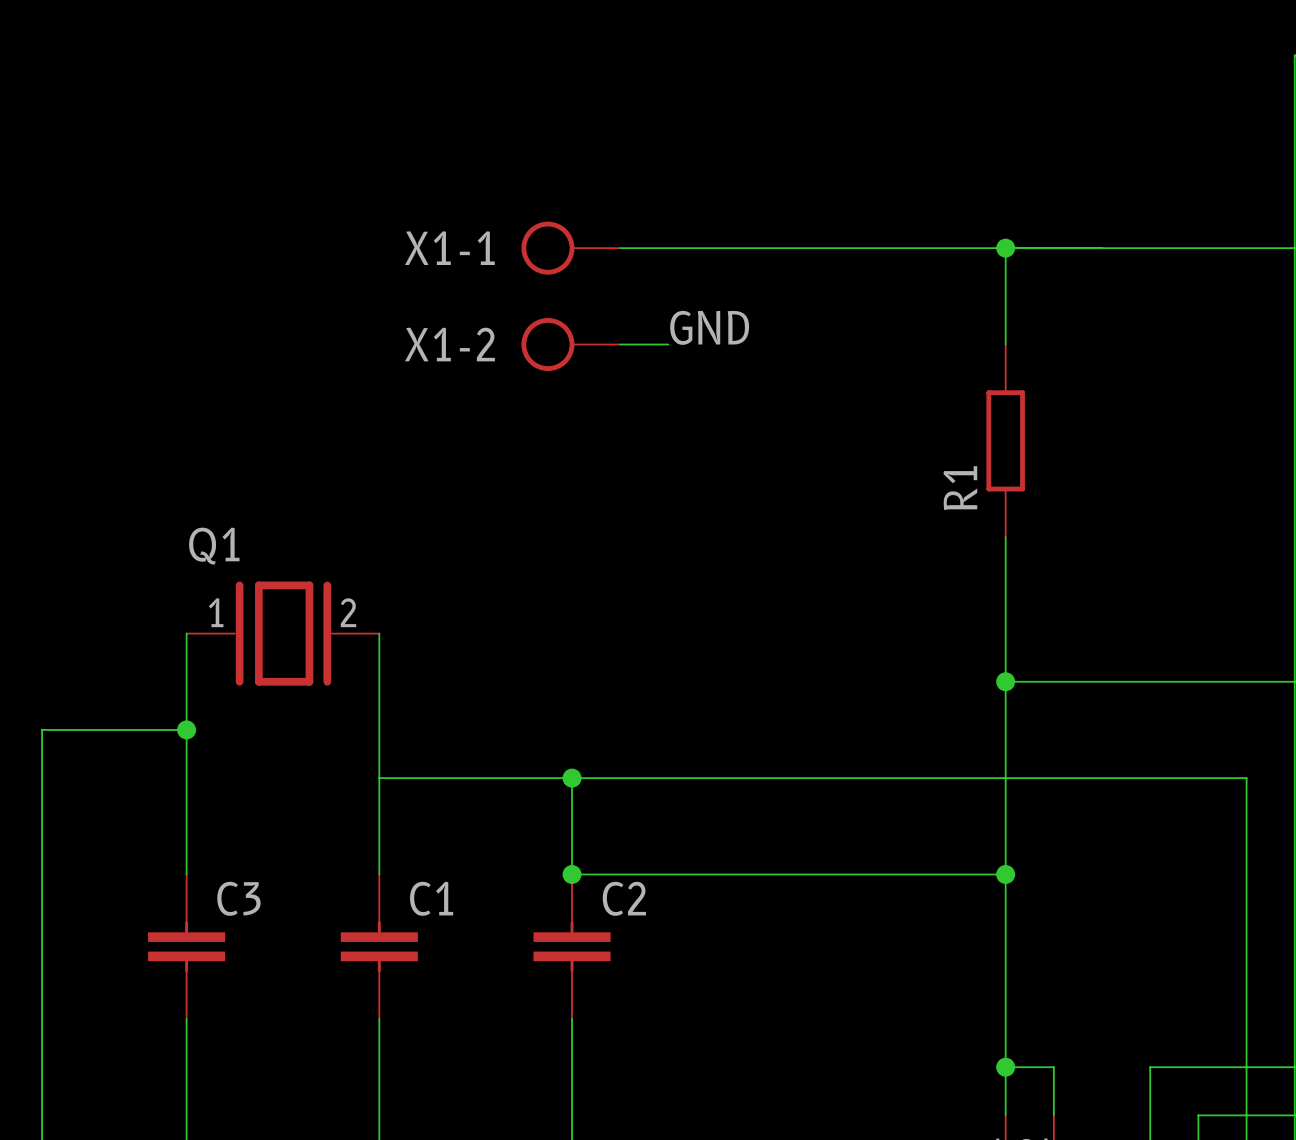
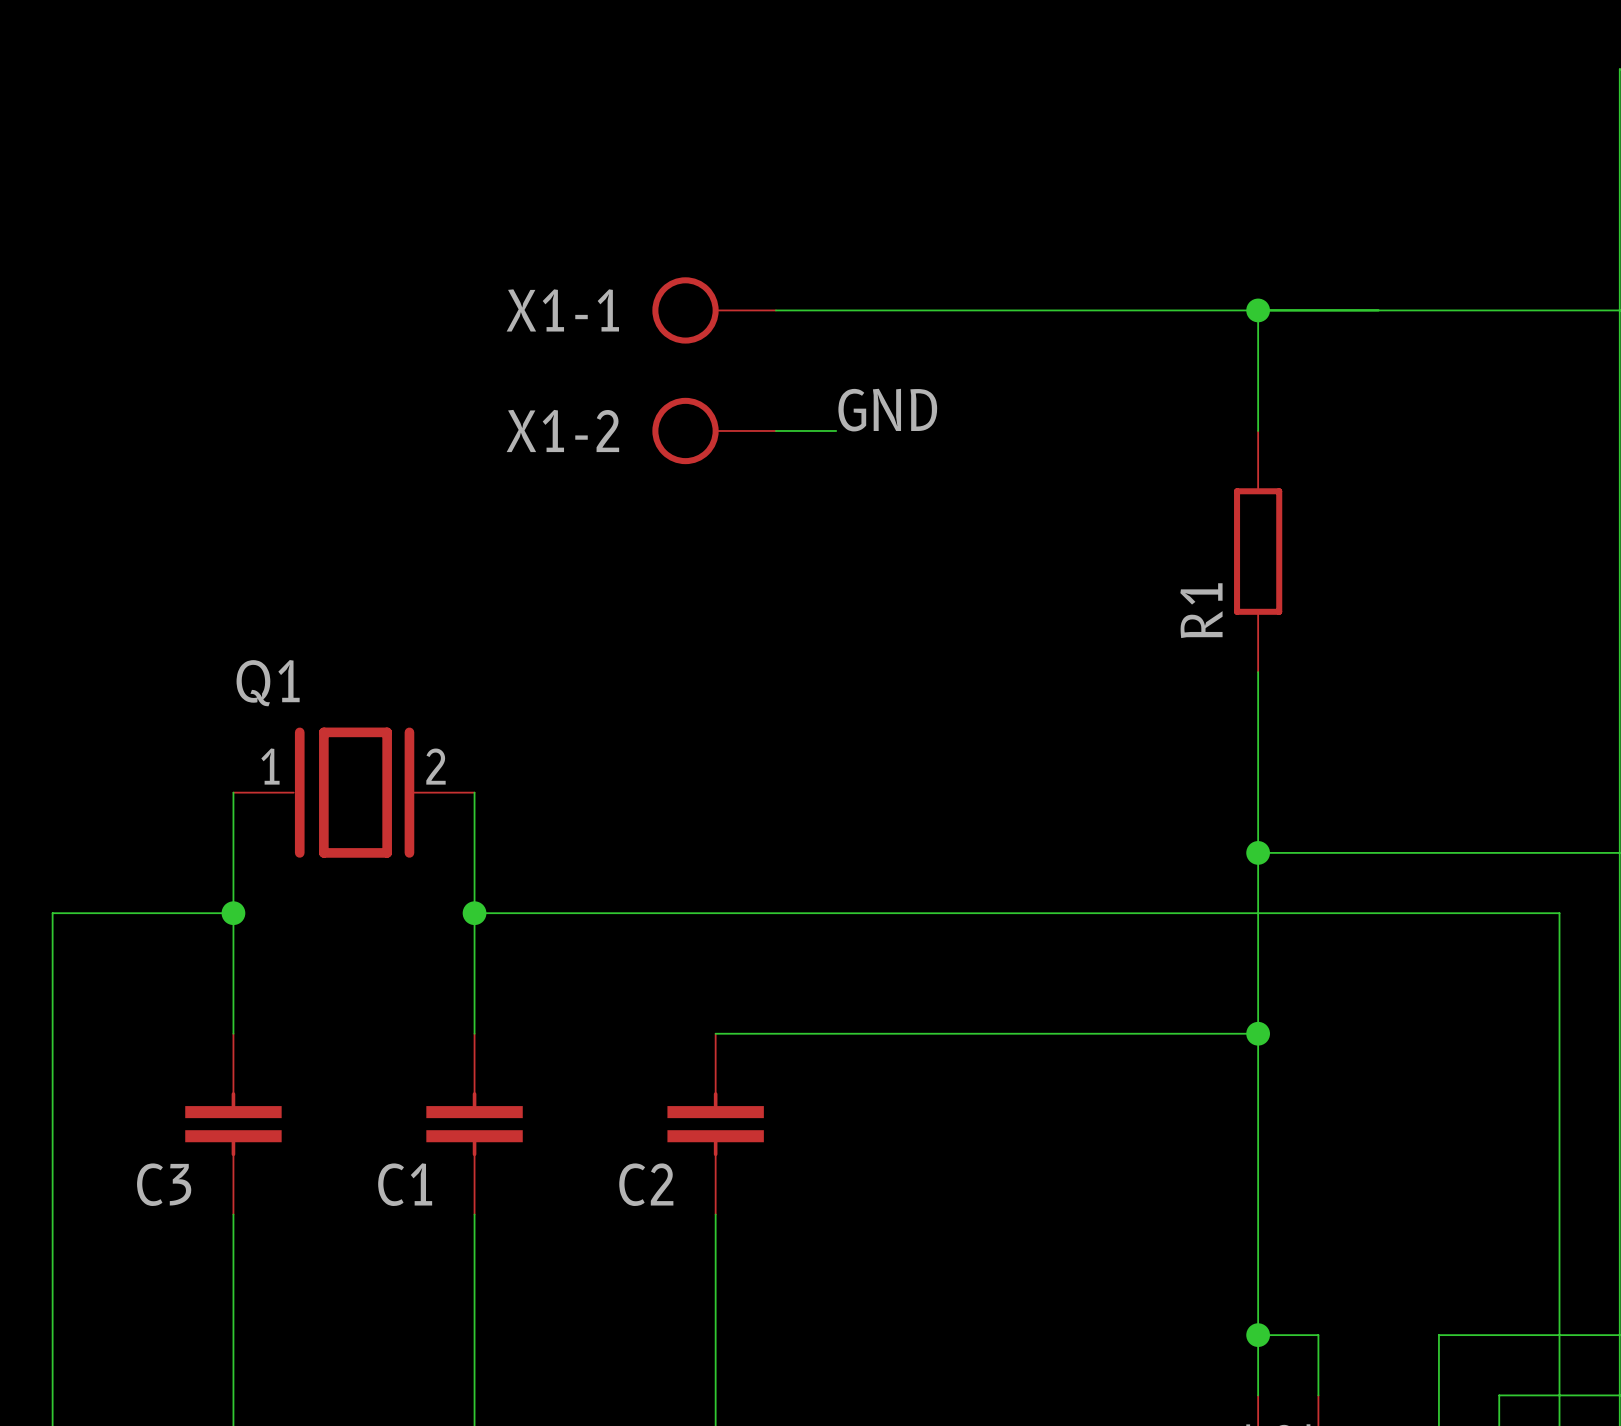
junction: none -> (474, 913)
wire: (379, 778) (1246, 778) -> (474, 913) (1559, 913) (1559, 973)
wire: (572, 778) (572, 874) (1005, 874) -> none
junction: (572, 778) -> none
wire: none -> (715, 1033) (1258, 1033)
junction: (572, 874) -> none
junction position: (1005, 874) -> (1258, 1033)
C3 name position: C3 (238, 898) -> C3 (164, 1184)
C1 name position: C1 (431, 898) -> C1 (405, 1184)
C2 name position: C2 (624, 898) -> C2 (646, 1184)
C3 position: (186, 946) -> (233, 1124)
C1 position: (379, 946) -> (474, 1124)
C2 position: (572, 946) -> (715, 1124)

